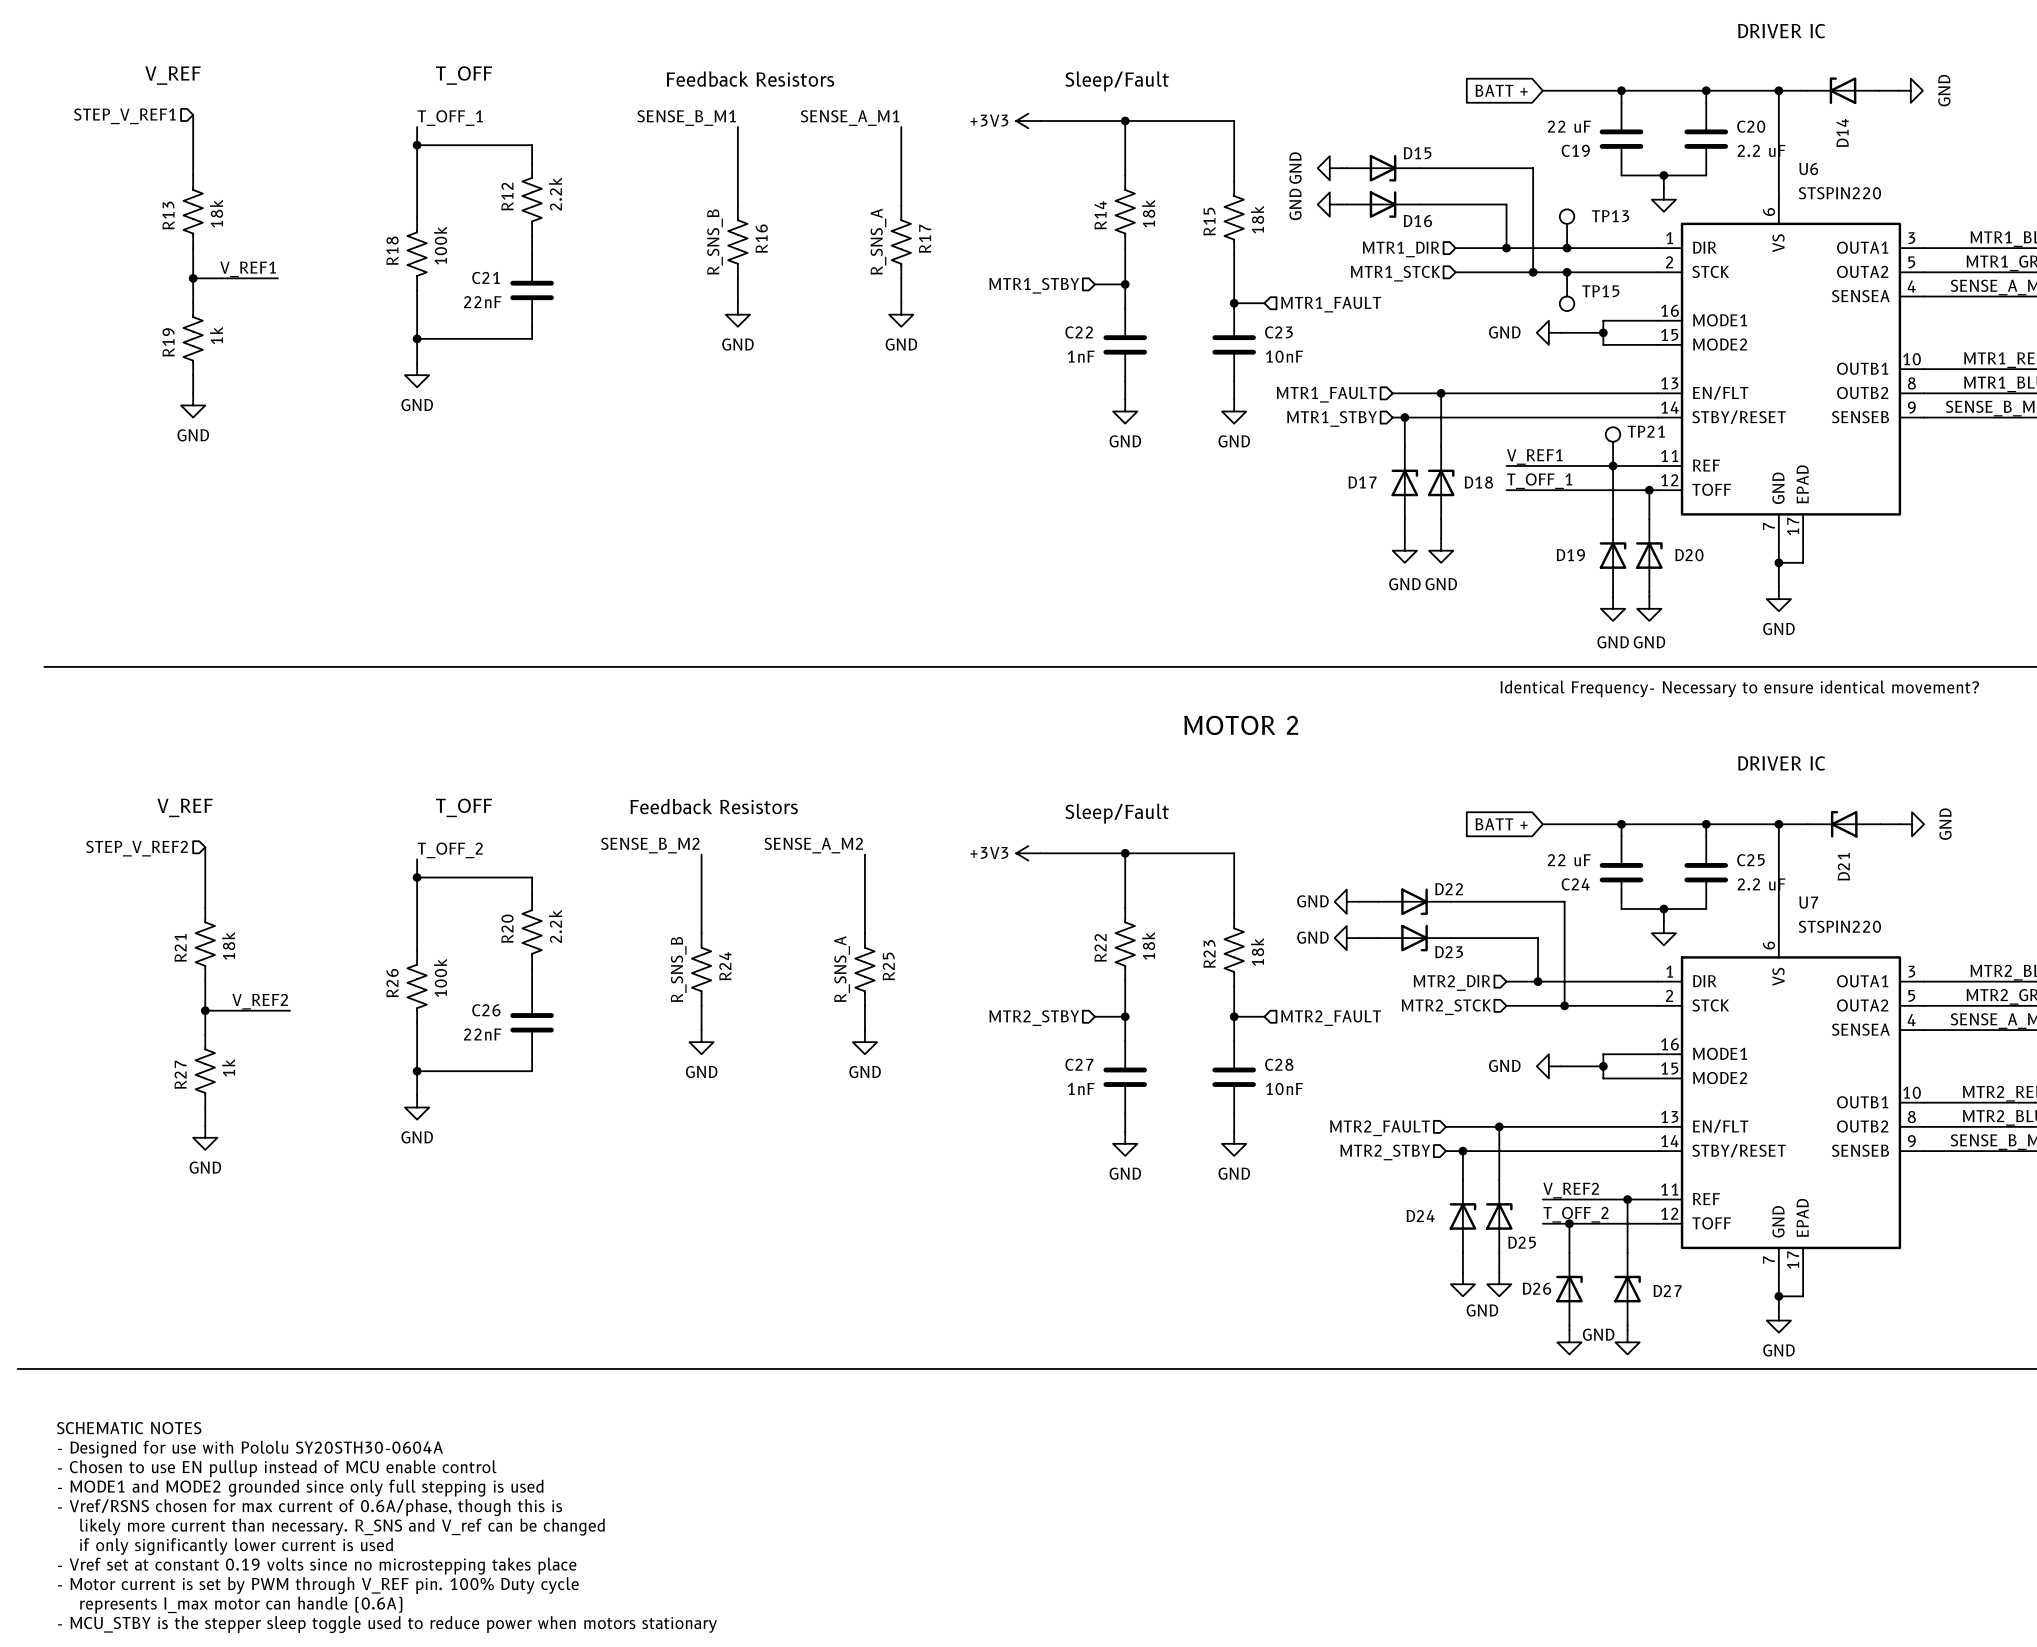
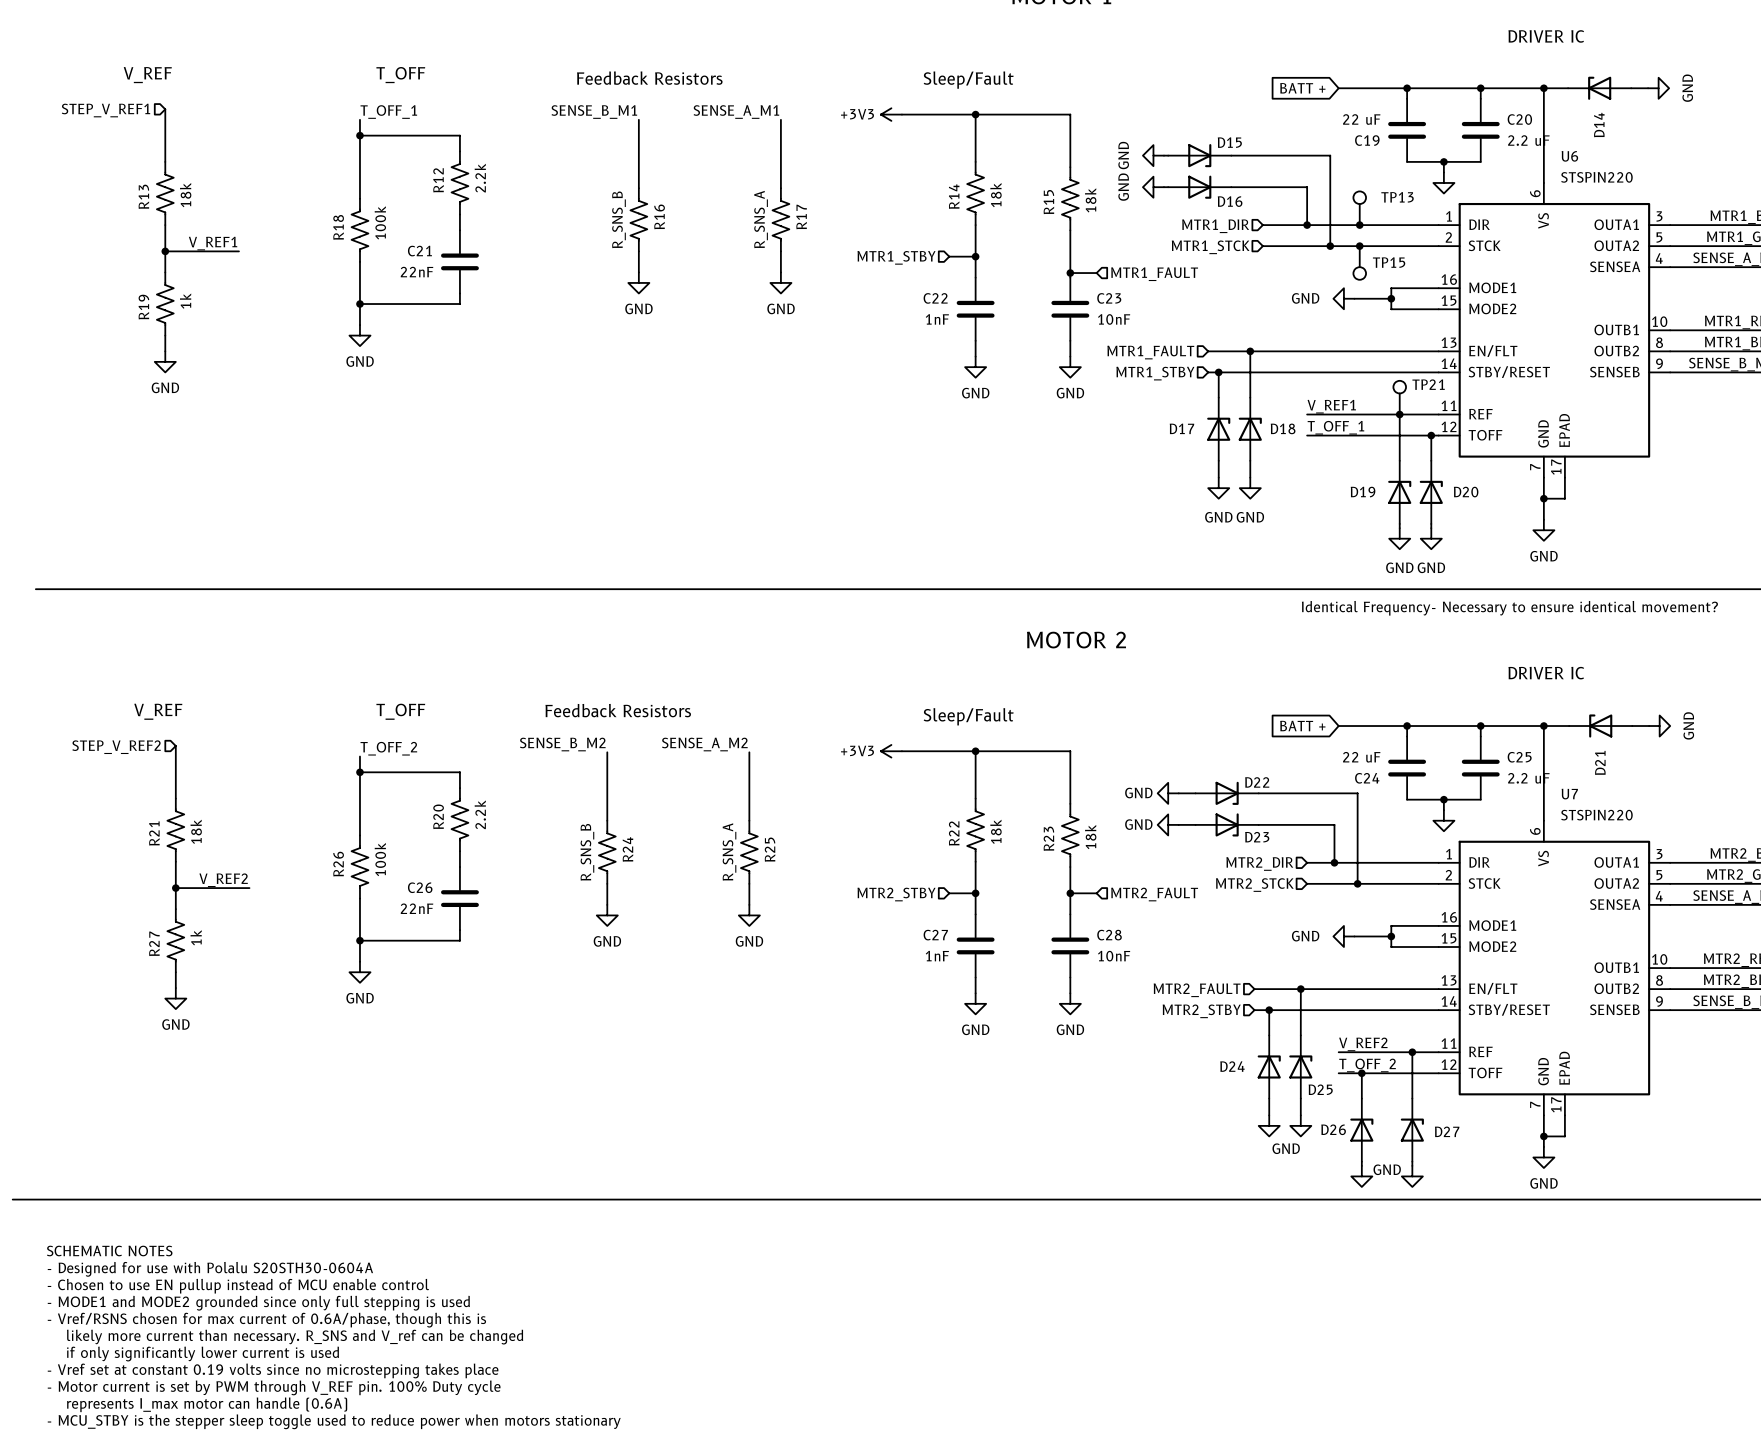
text: - Designed for use with Pololu SY20STH30-0604A (250, 1449) -> - Designed for use with Polalu S20STH30-0604A (210, 1269)

